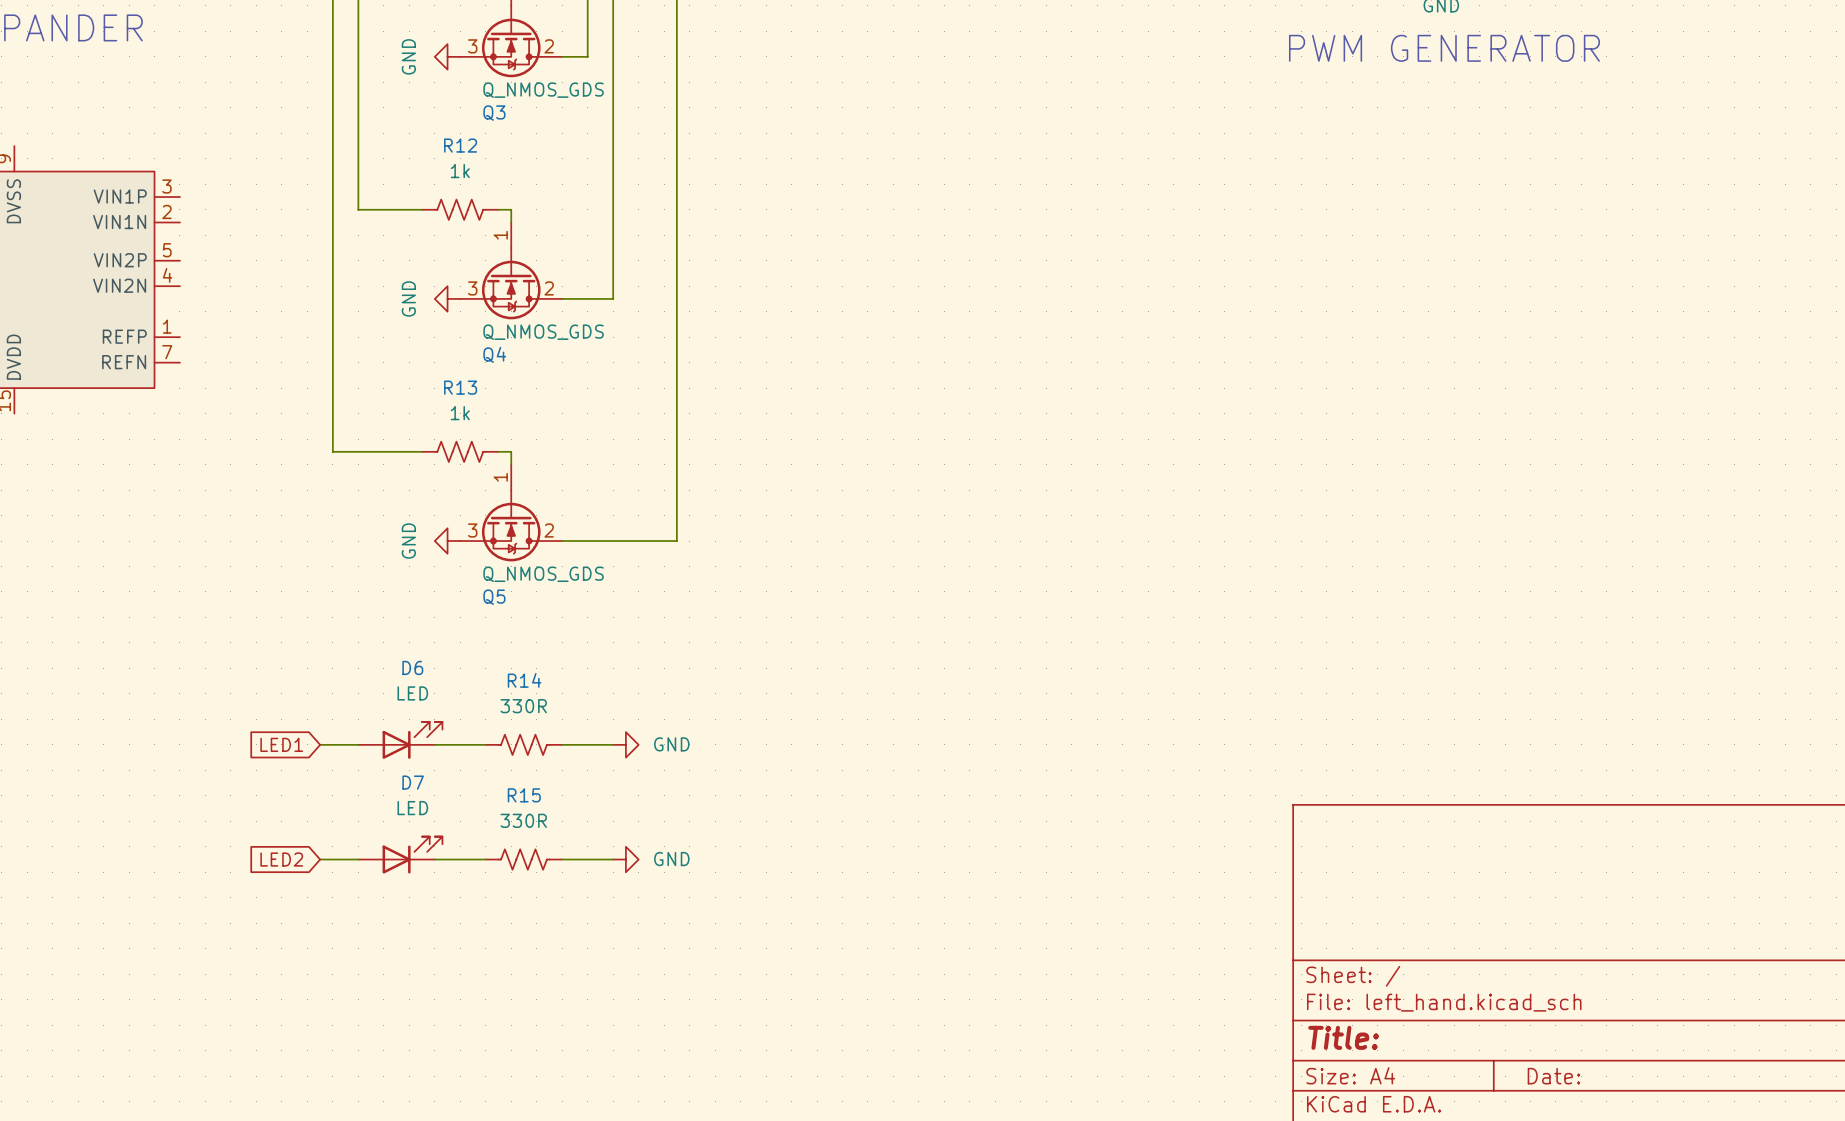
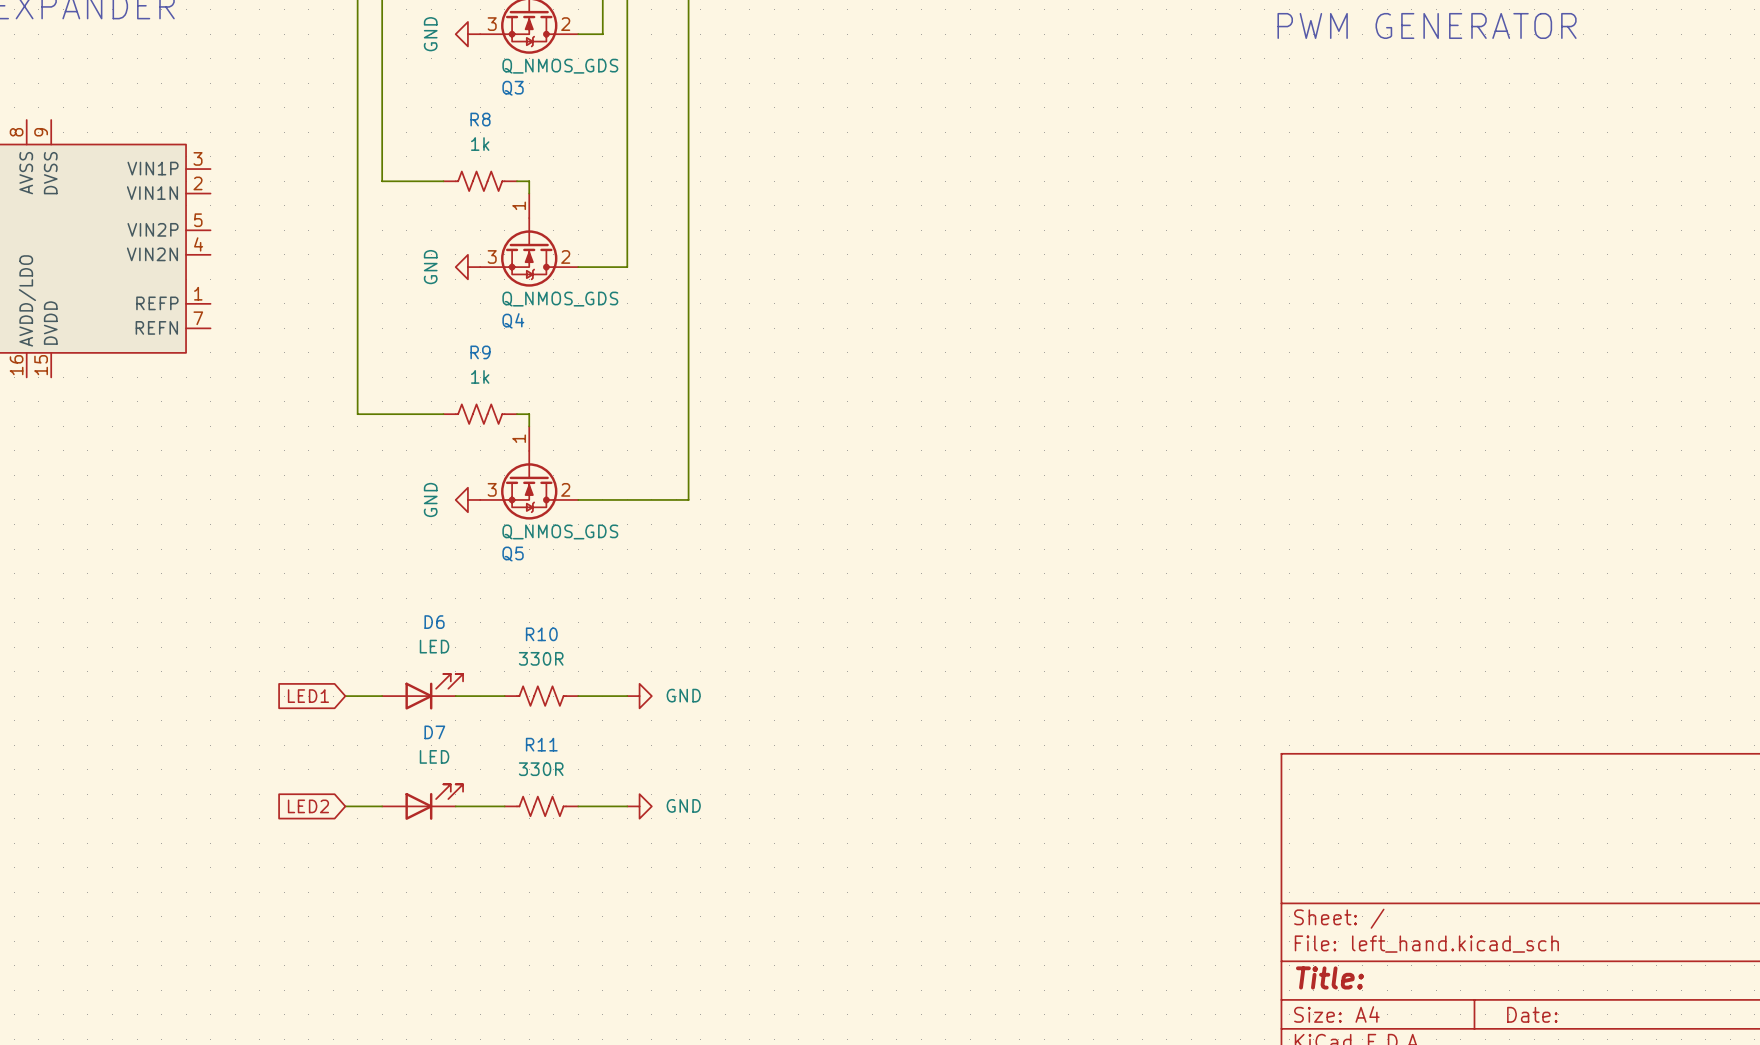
R12 name: R12 (460, 145) -> R8 (480, 119)
R13 name: R13 (460, 387) -> R9 (480, 352)
R14 name: R14 (524, 680) -> R10 (541, 634)
R15 name: R15 (524, 795) -> R11 (541, 744)

